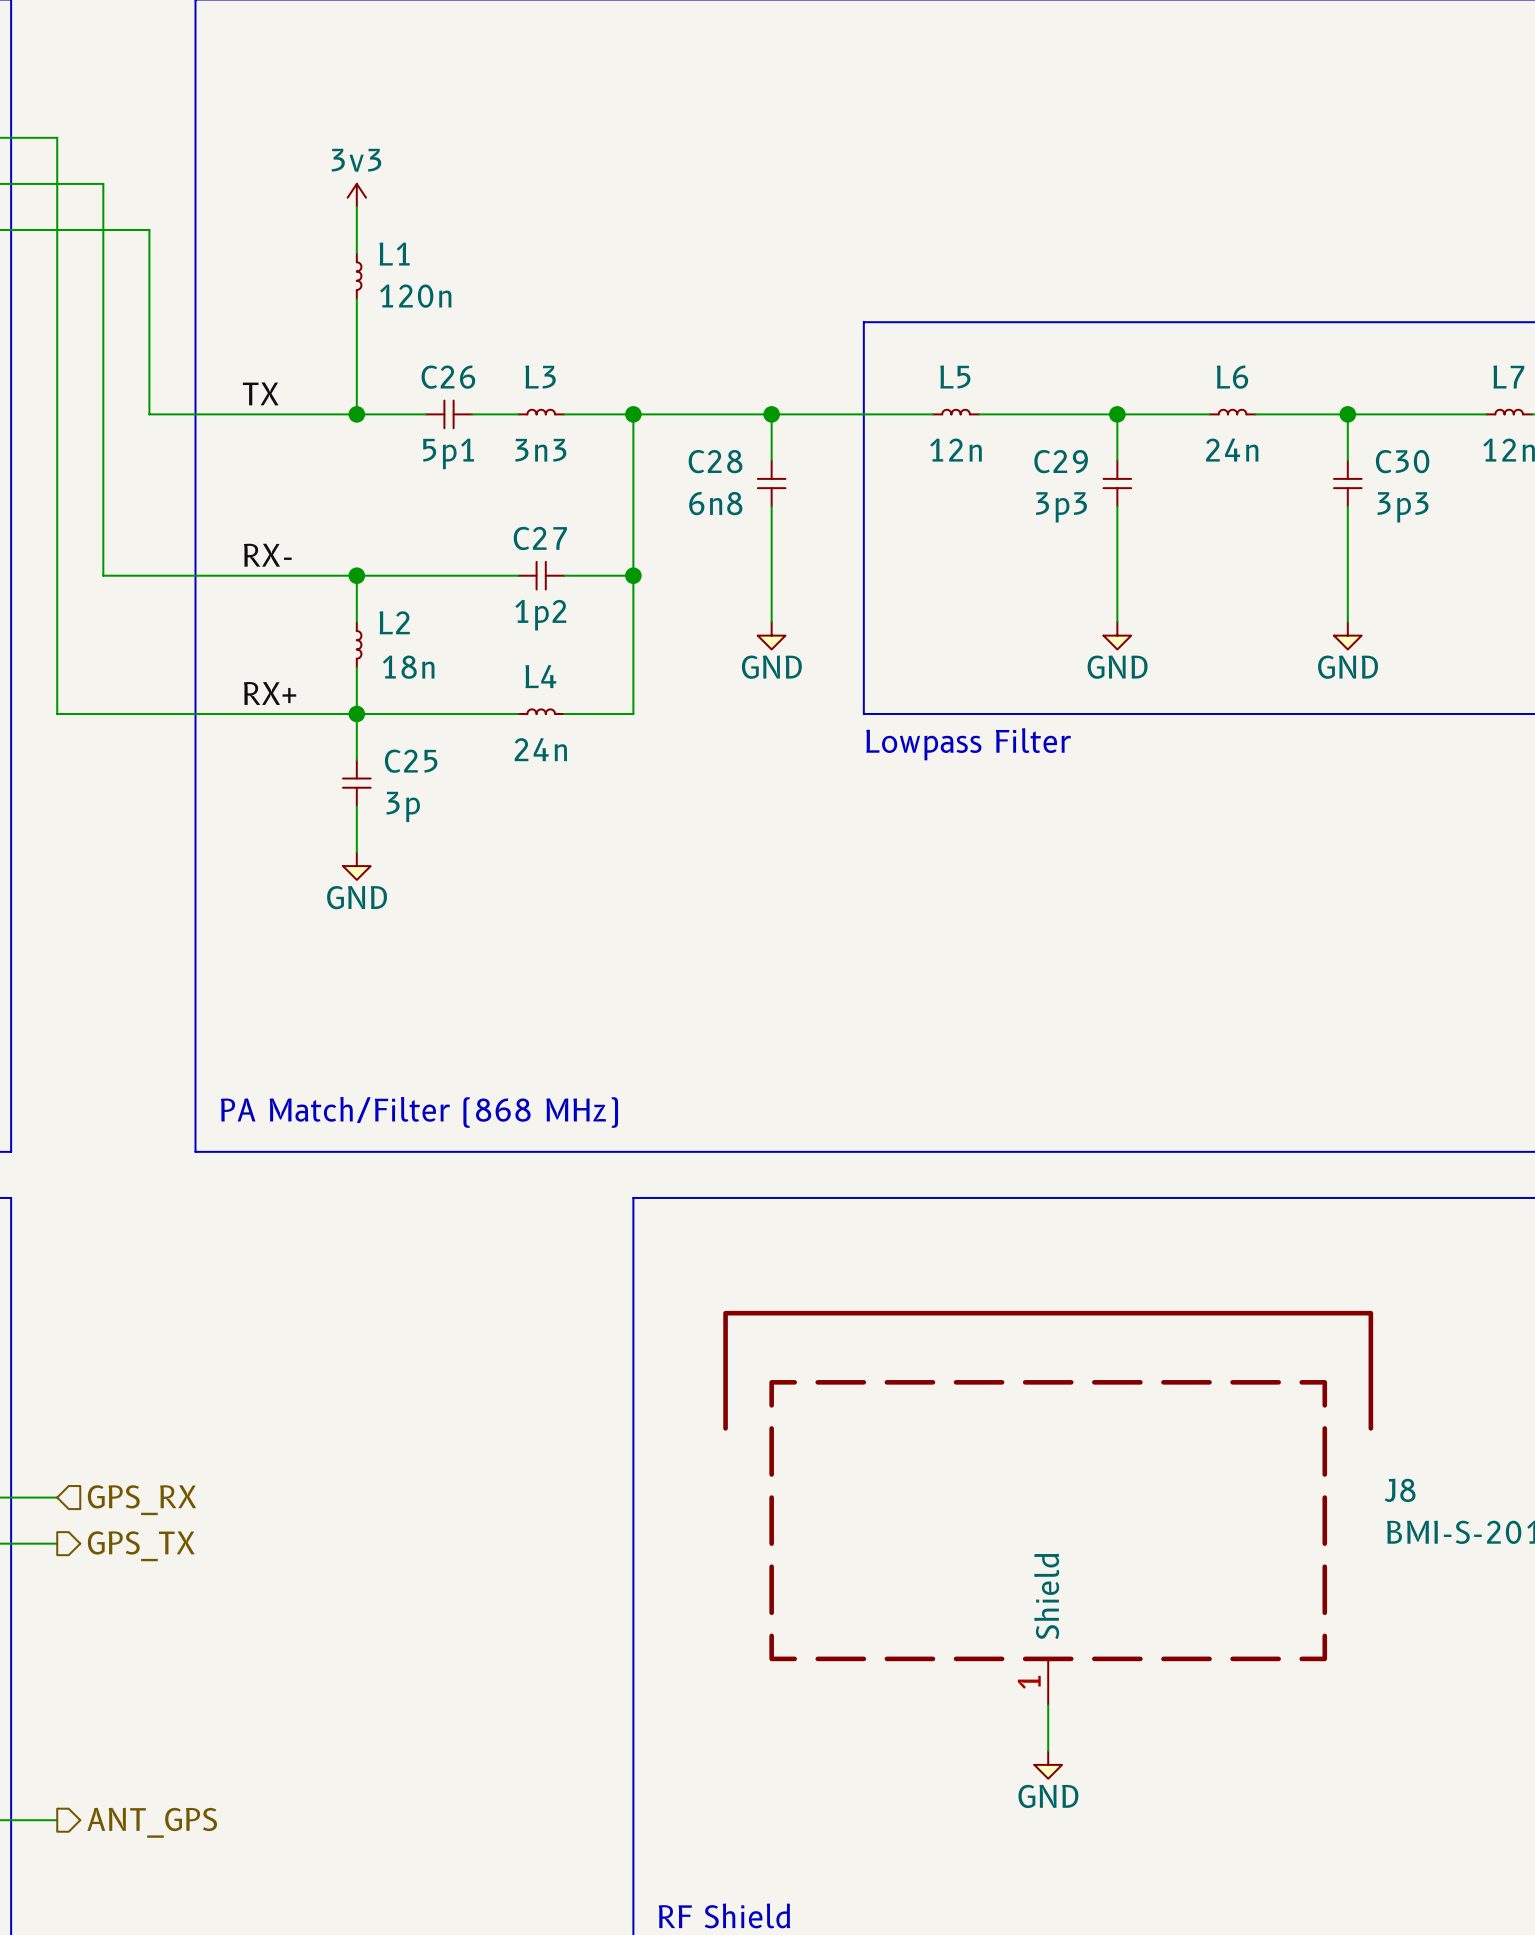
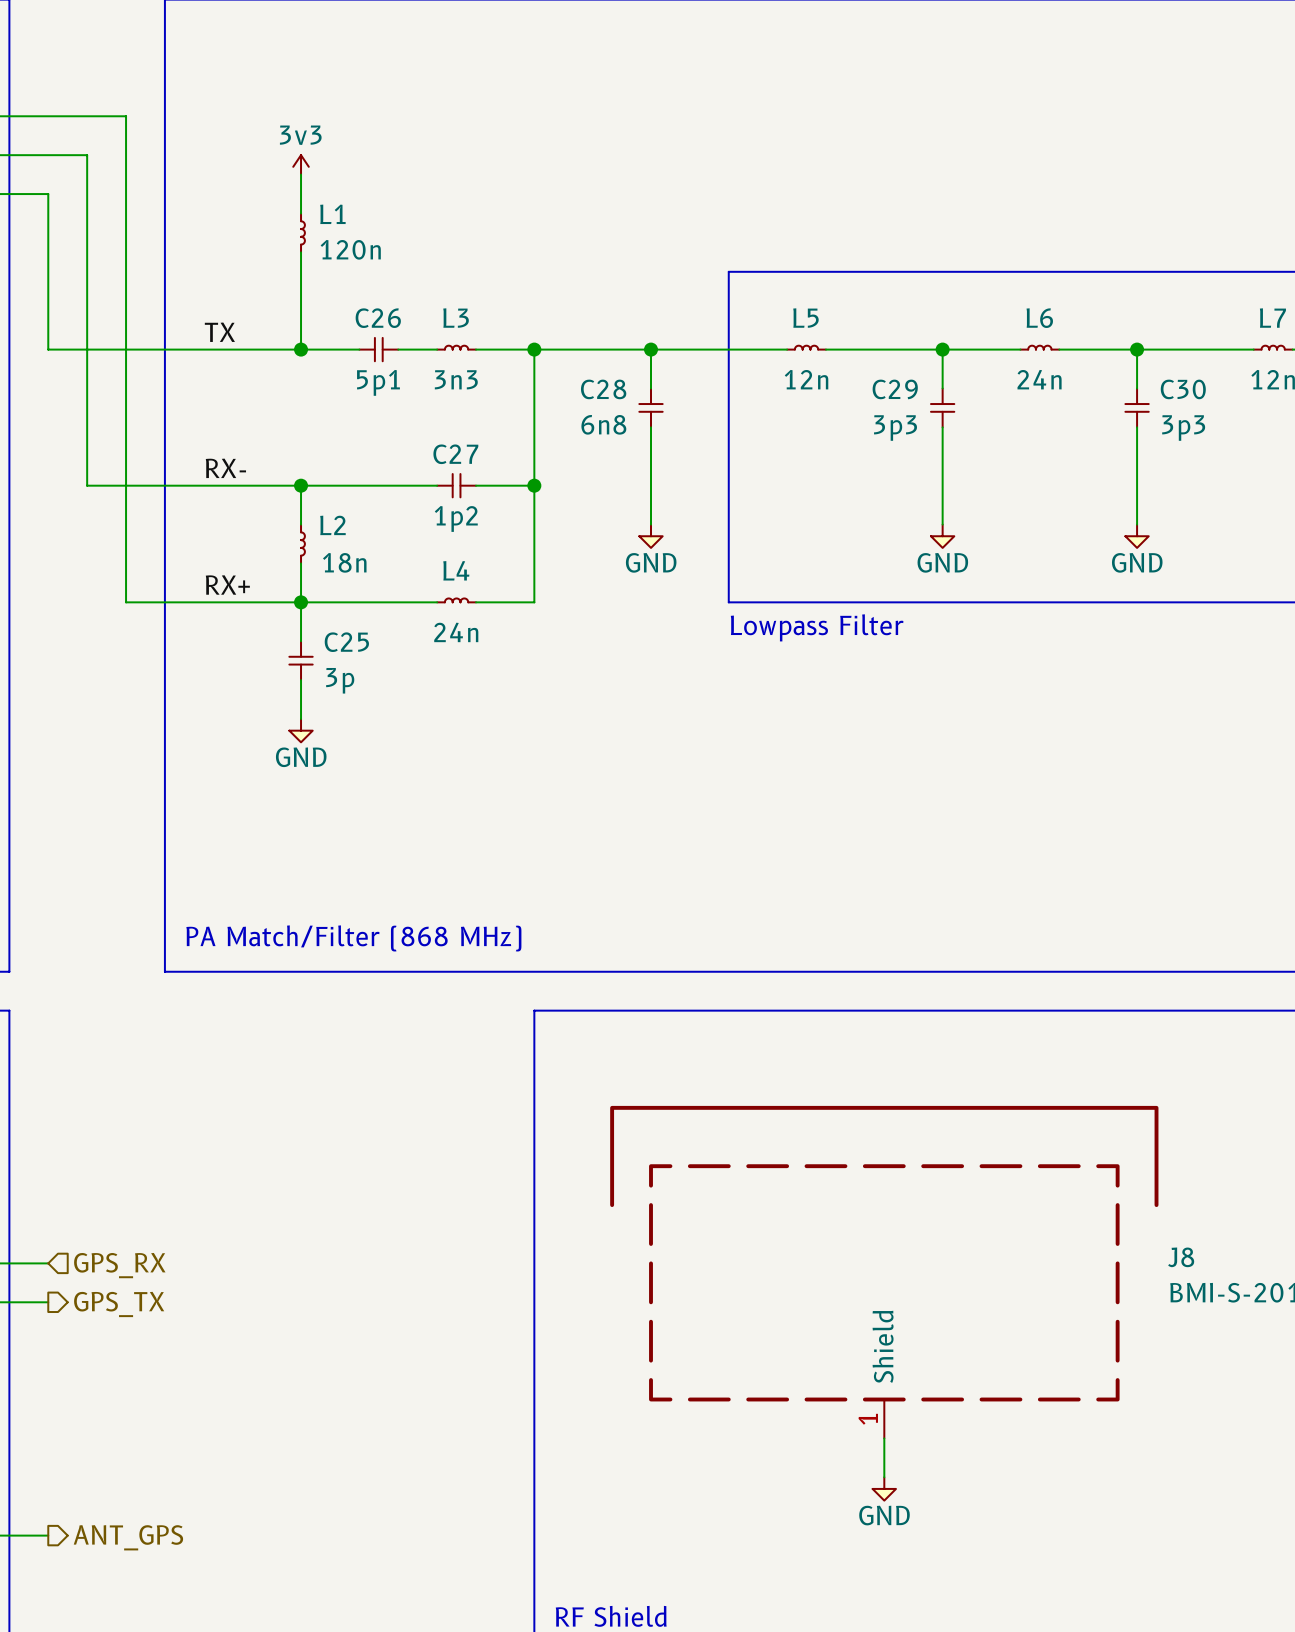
wire: (57, 137) (57, 230) (149, 230) -> (48, 116) (126, 116) (126, 194)
wire: (57, 414) (57, 713) (149, 713) -> (48, 349) (126, 349) (126, 602)

